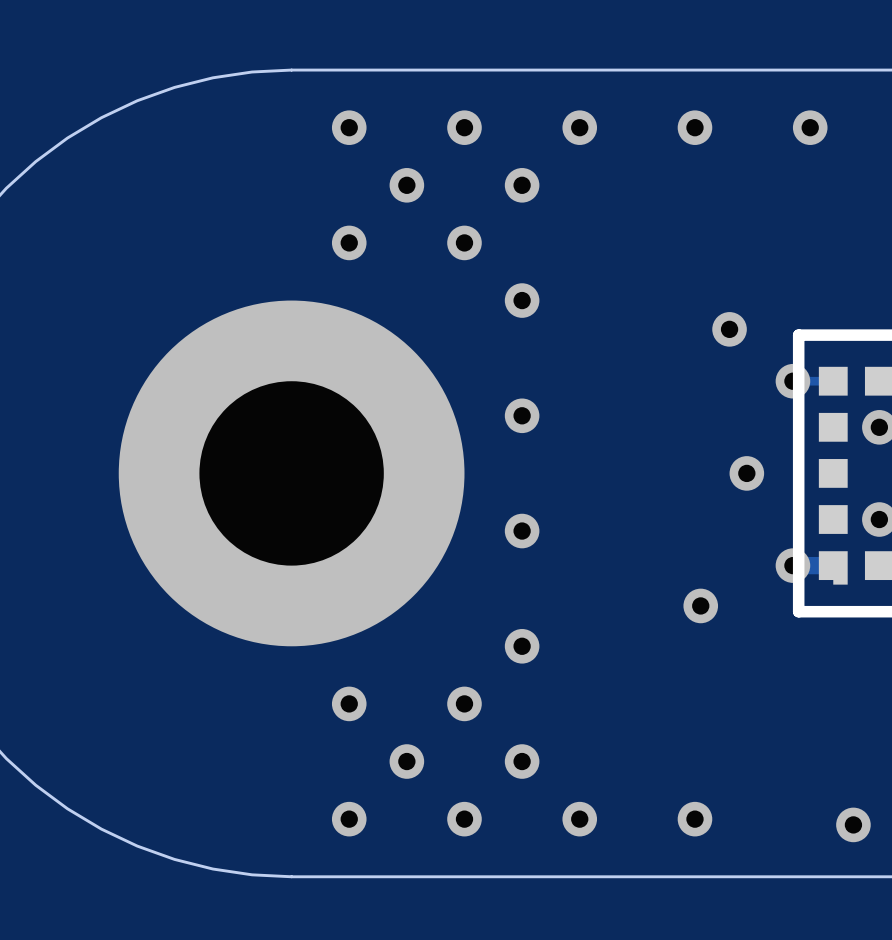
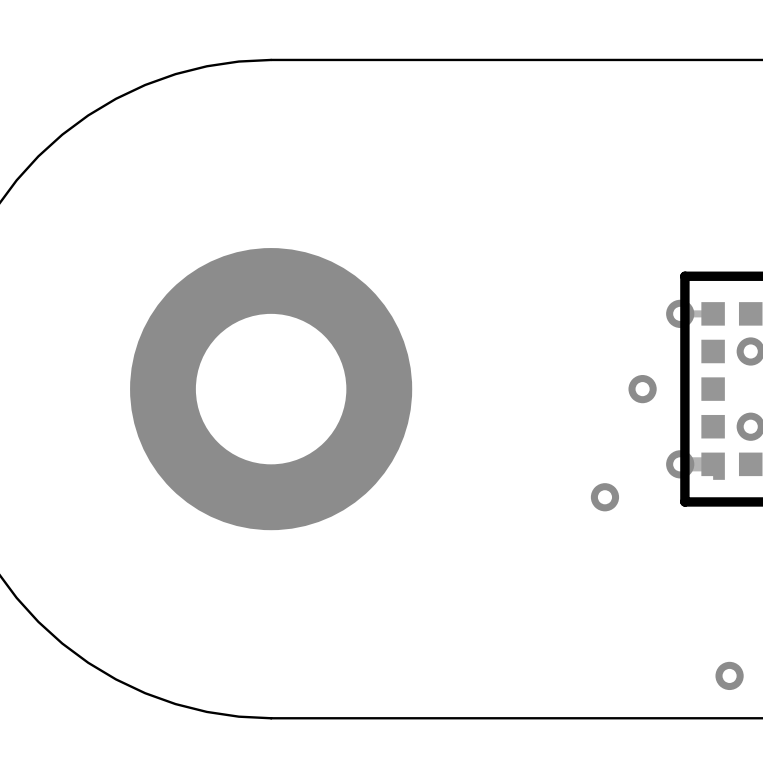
via: (349, 127) -> none
via: (464, 127) -> none
via: (579, 127) -> none
via: (694, 127) -> none
via: (810, 127) -> none
via: (406, 185) -> none
via: (522, 185) -> none
via: (349, 242) -> none
via: (464, 242) -> none
via: (522, 300) -> none
via: (729, 329) -> none
via: (522, 415) -> none
via: (522, 531) -> none
via: (522, 646) -> none
via: (349, 703) -> none
via: (464, 703) -> none
via: (406, 761) -> none
via: (522, 761) -> none
via: (349, 819) -> none
via: (464, 819) -> none
via: (579, 819) -> none
via: (694, 819) -> none

